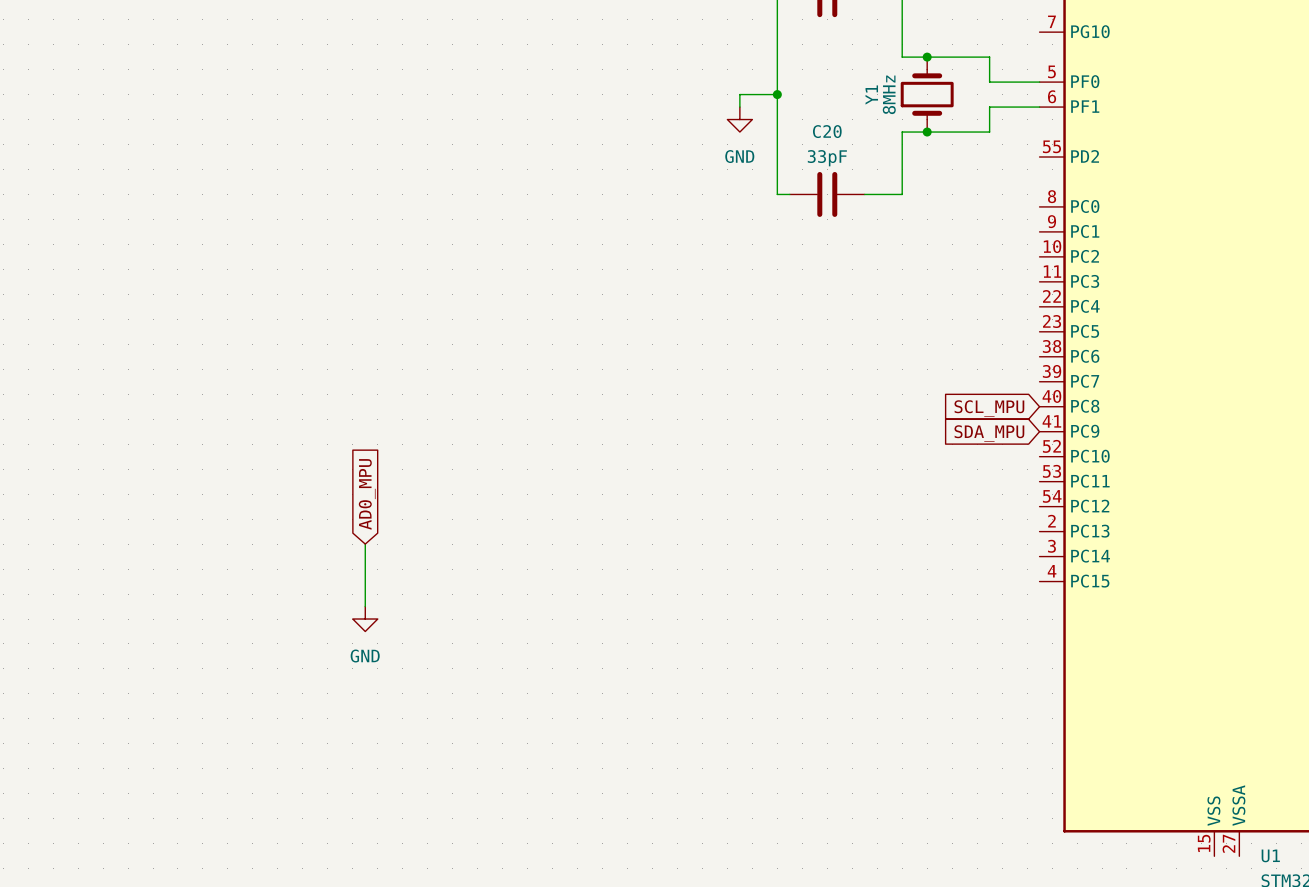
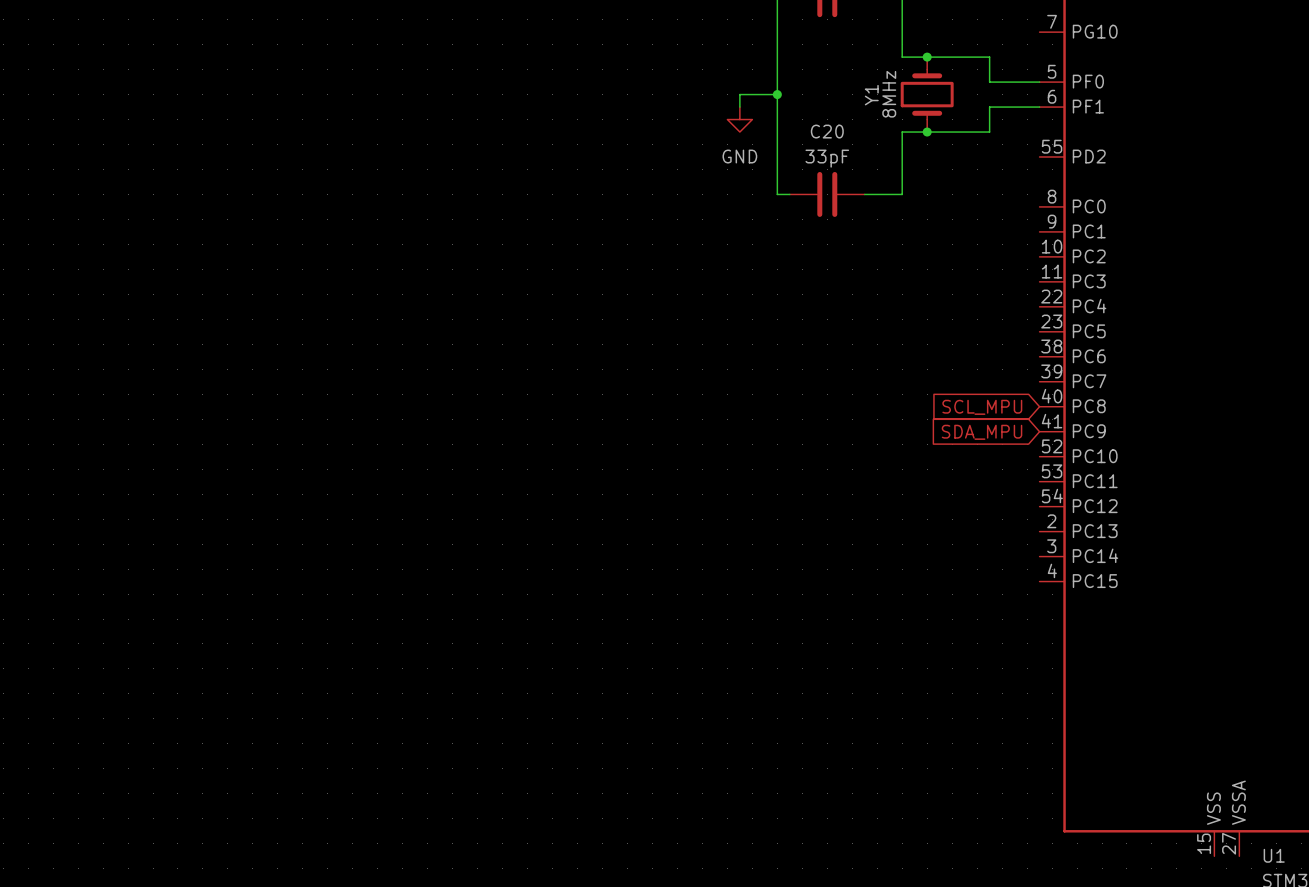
global label: AD0_MPU (367, 494) -> none
wire: (365, 544) (365, 606) -> none
power symbol: GND (365, 619) -> none

